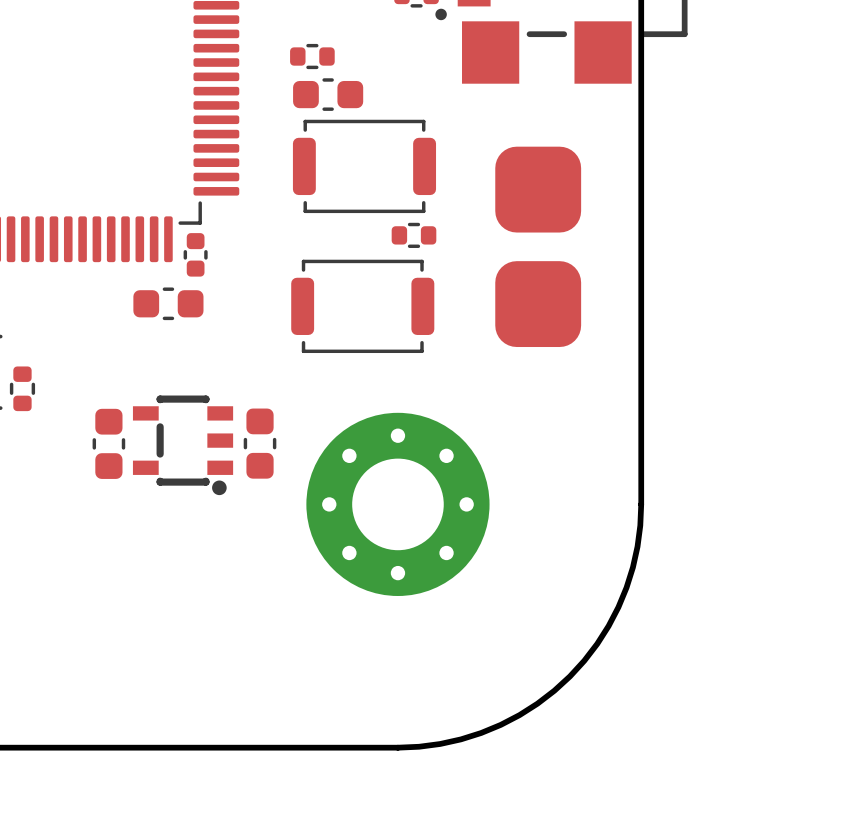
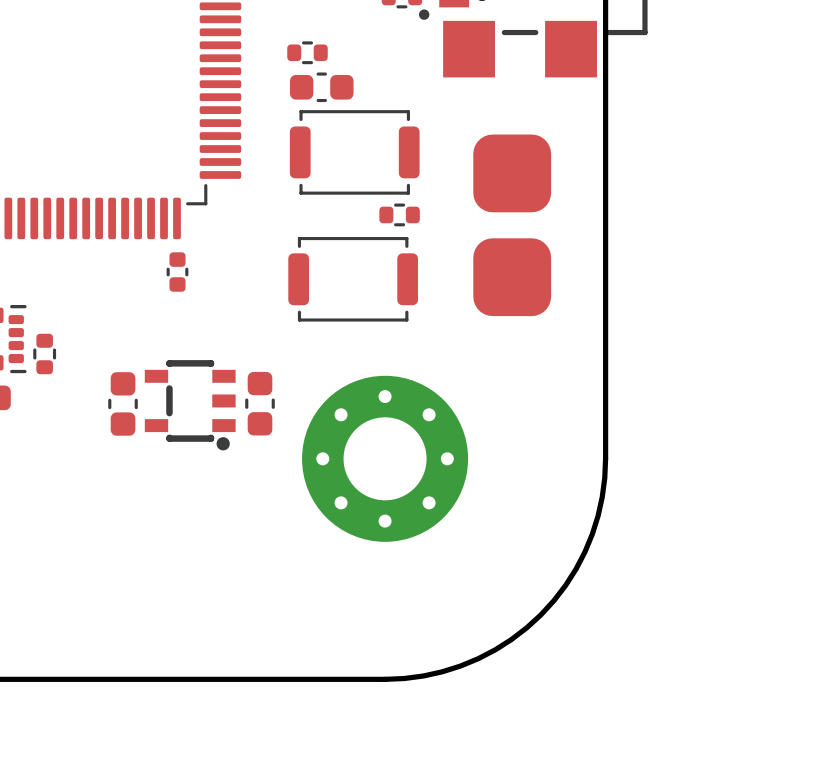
part: (195, 254) -> none
part footprint: [133, 287, 204, 321] -> [166, 252, 189, 292]

